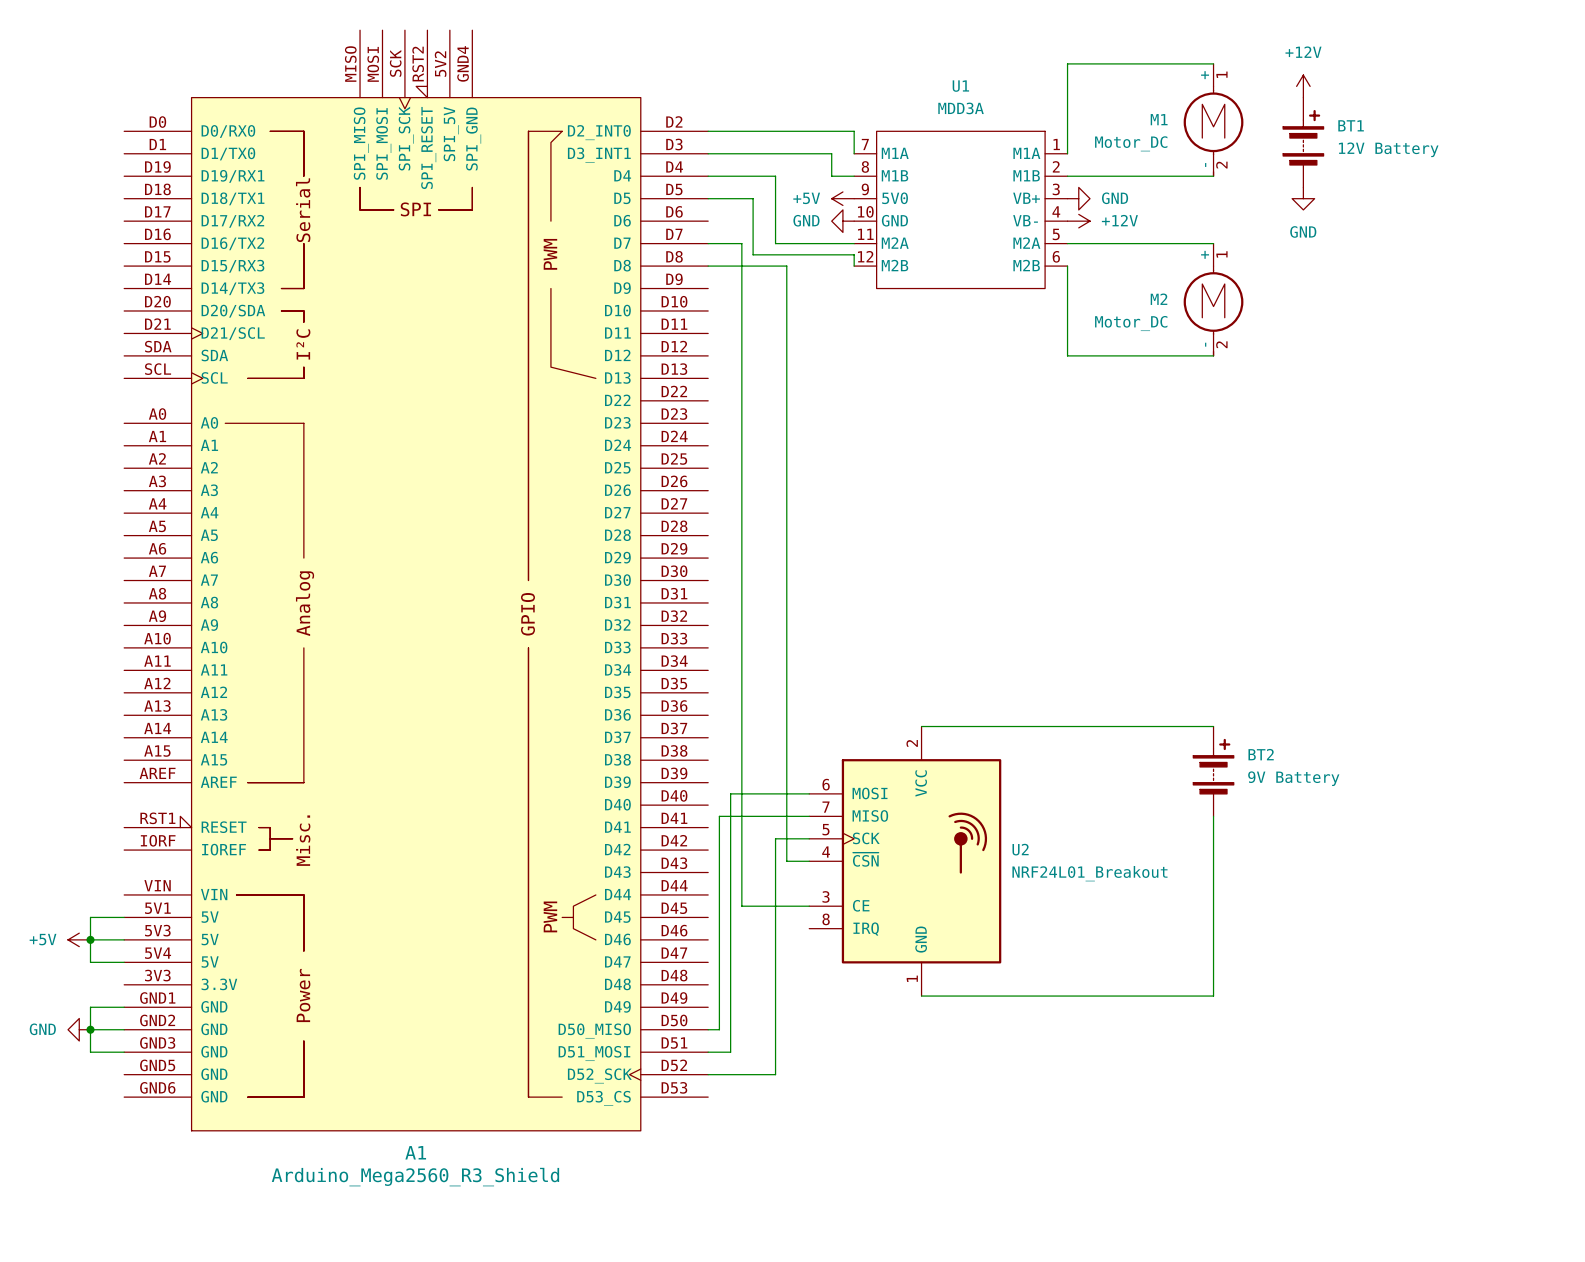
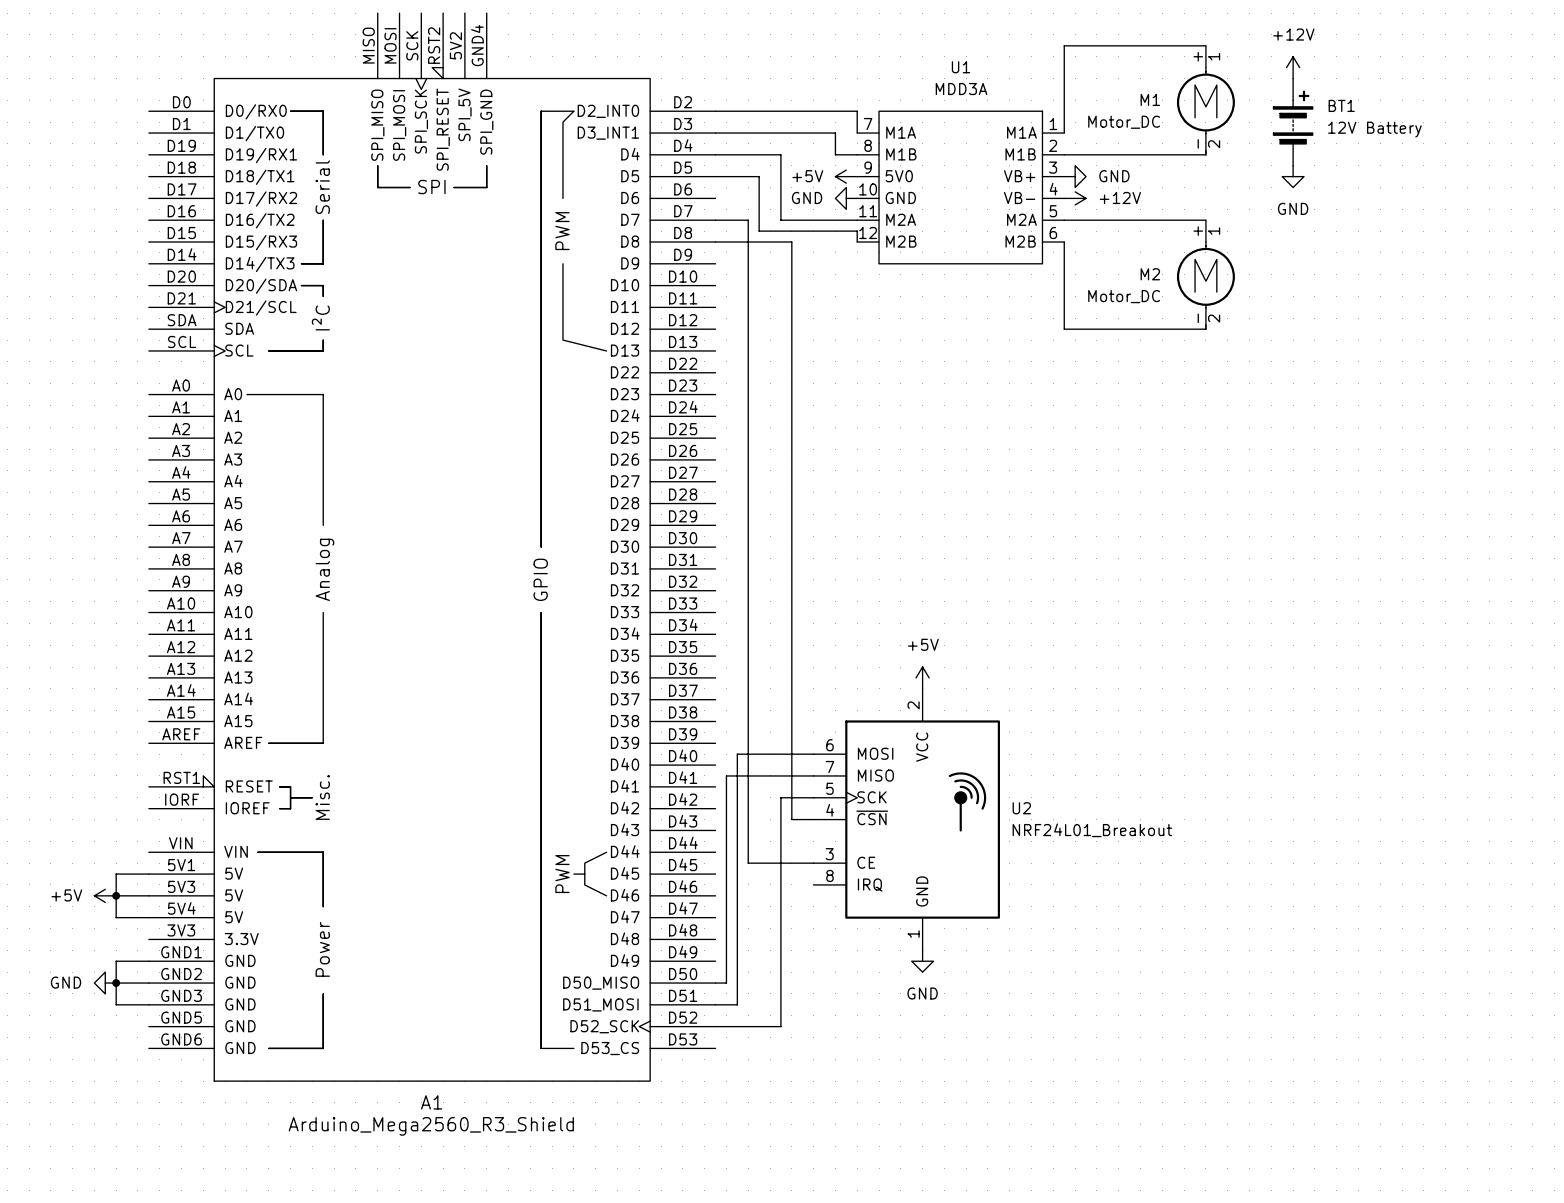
power symbol: none -> +5V (922, 677)
wire: (921, 726) (1213, 726) -> none
BT2: 9V Battery (1213, 771) -> none
wire: (1213, 816) (1213, 996) (921, 996) -> none
power symbol: none -> GND (922, 961)

